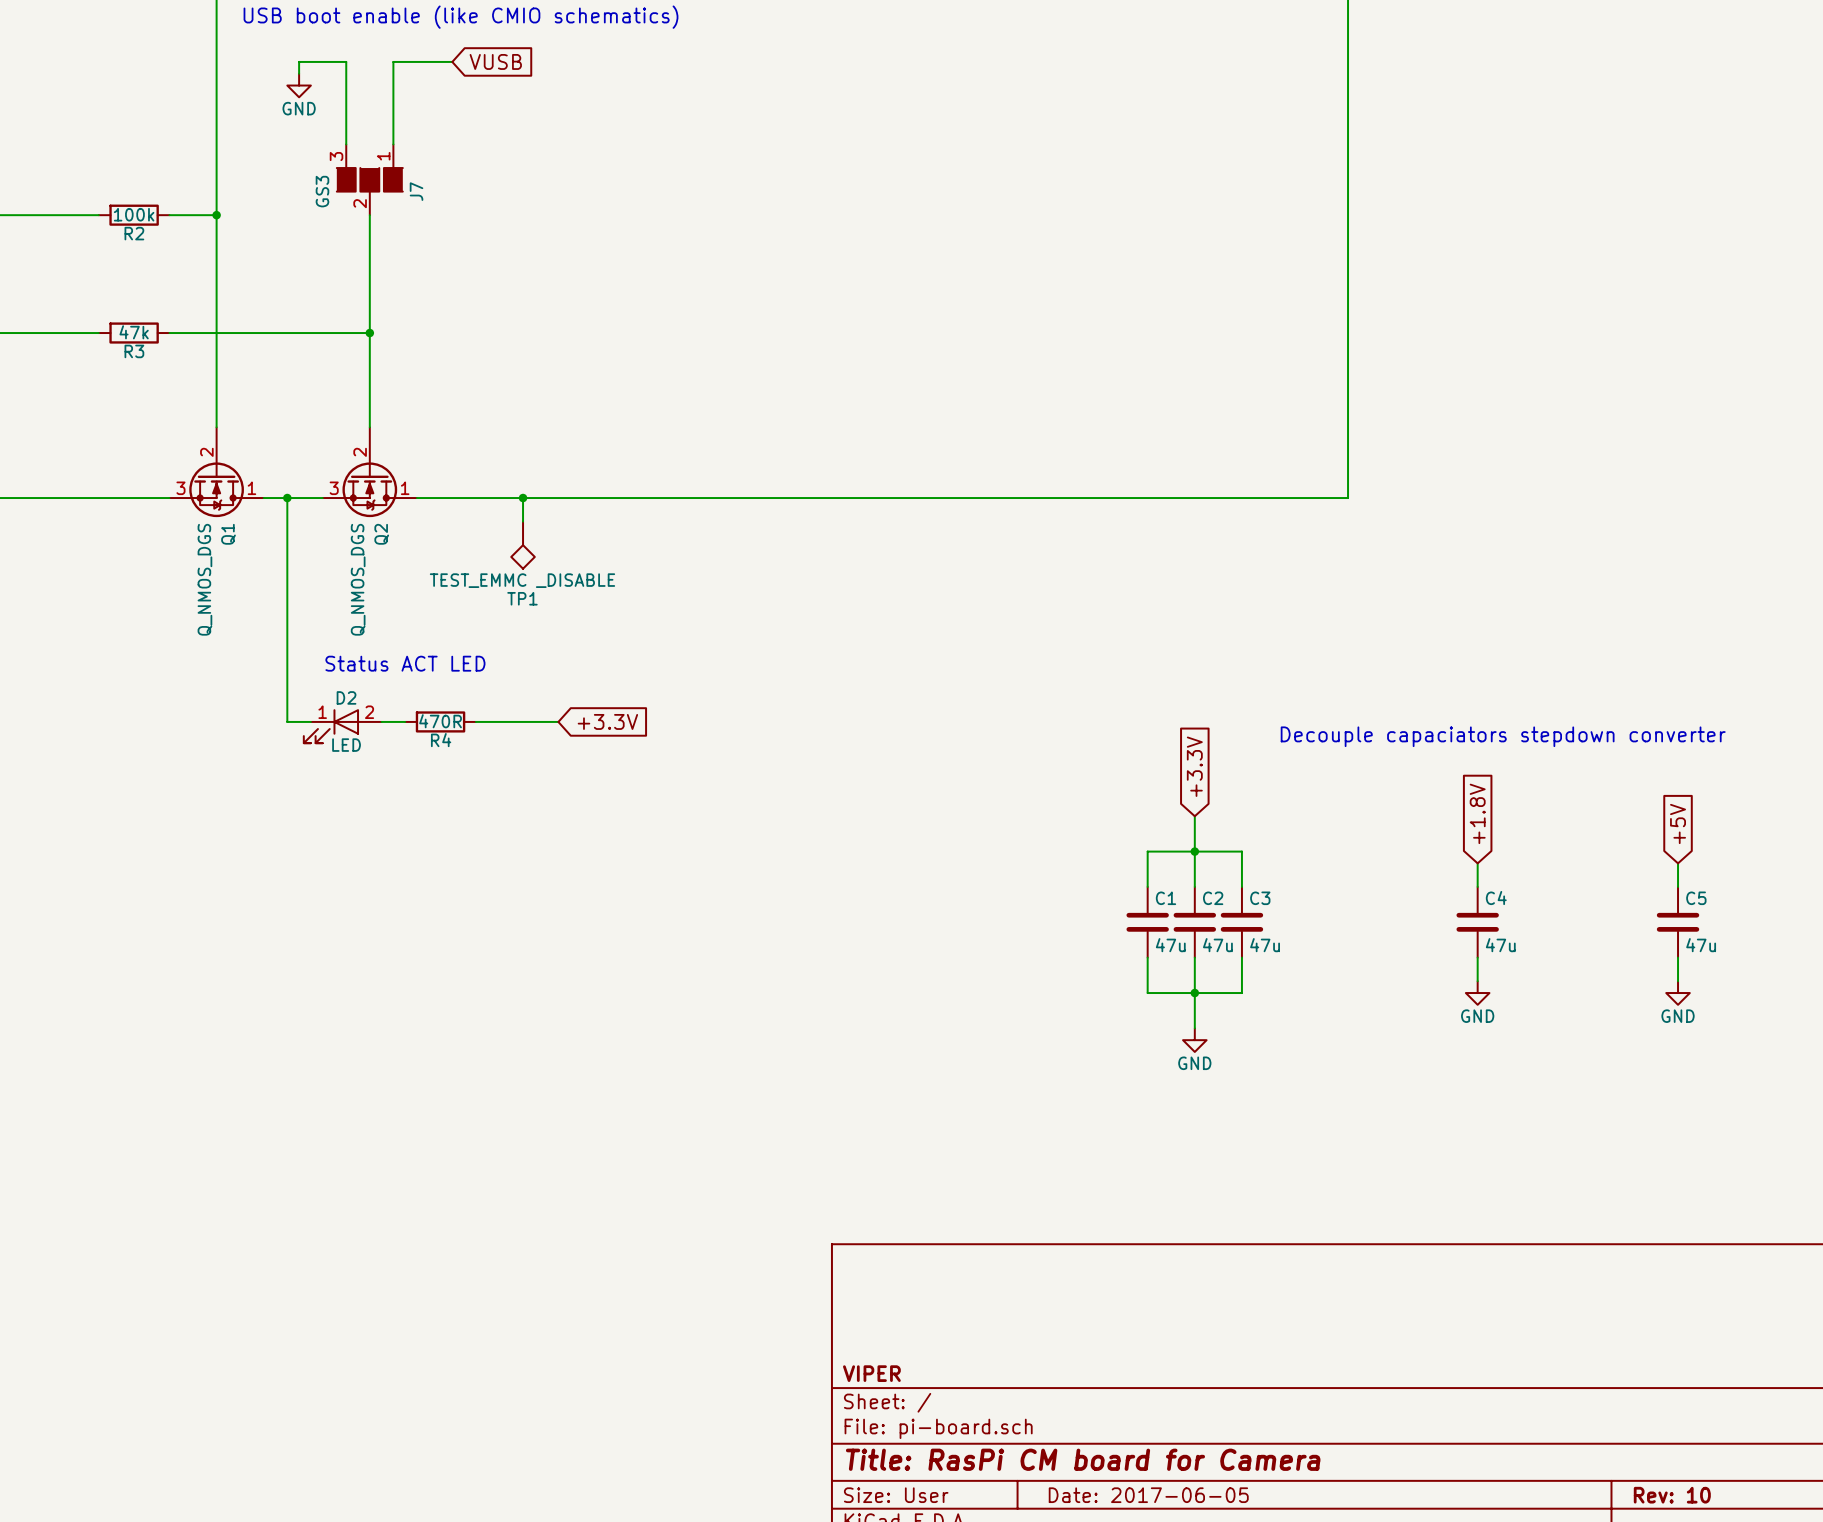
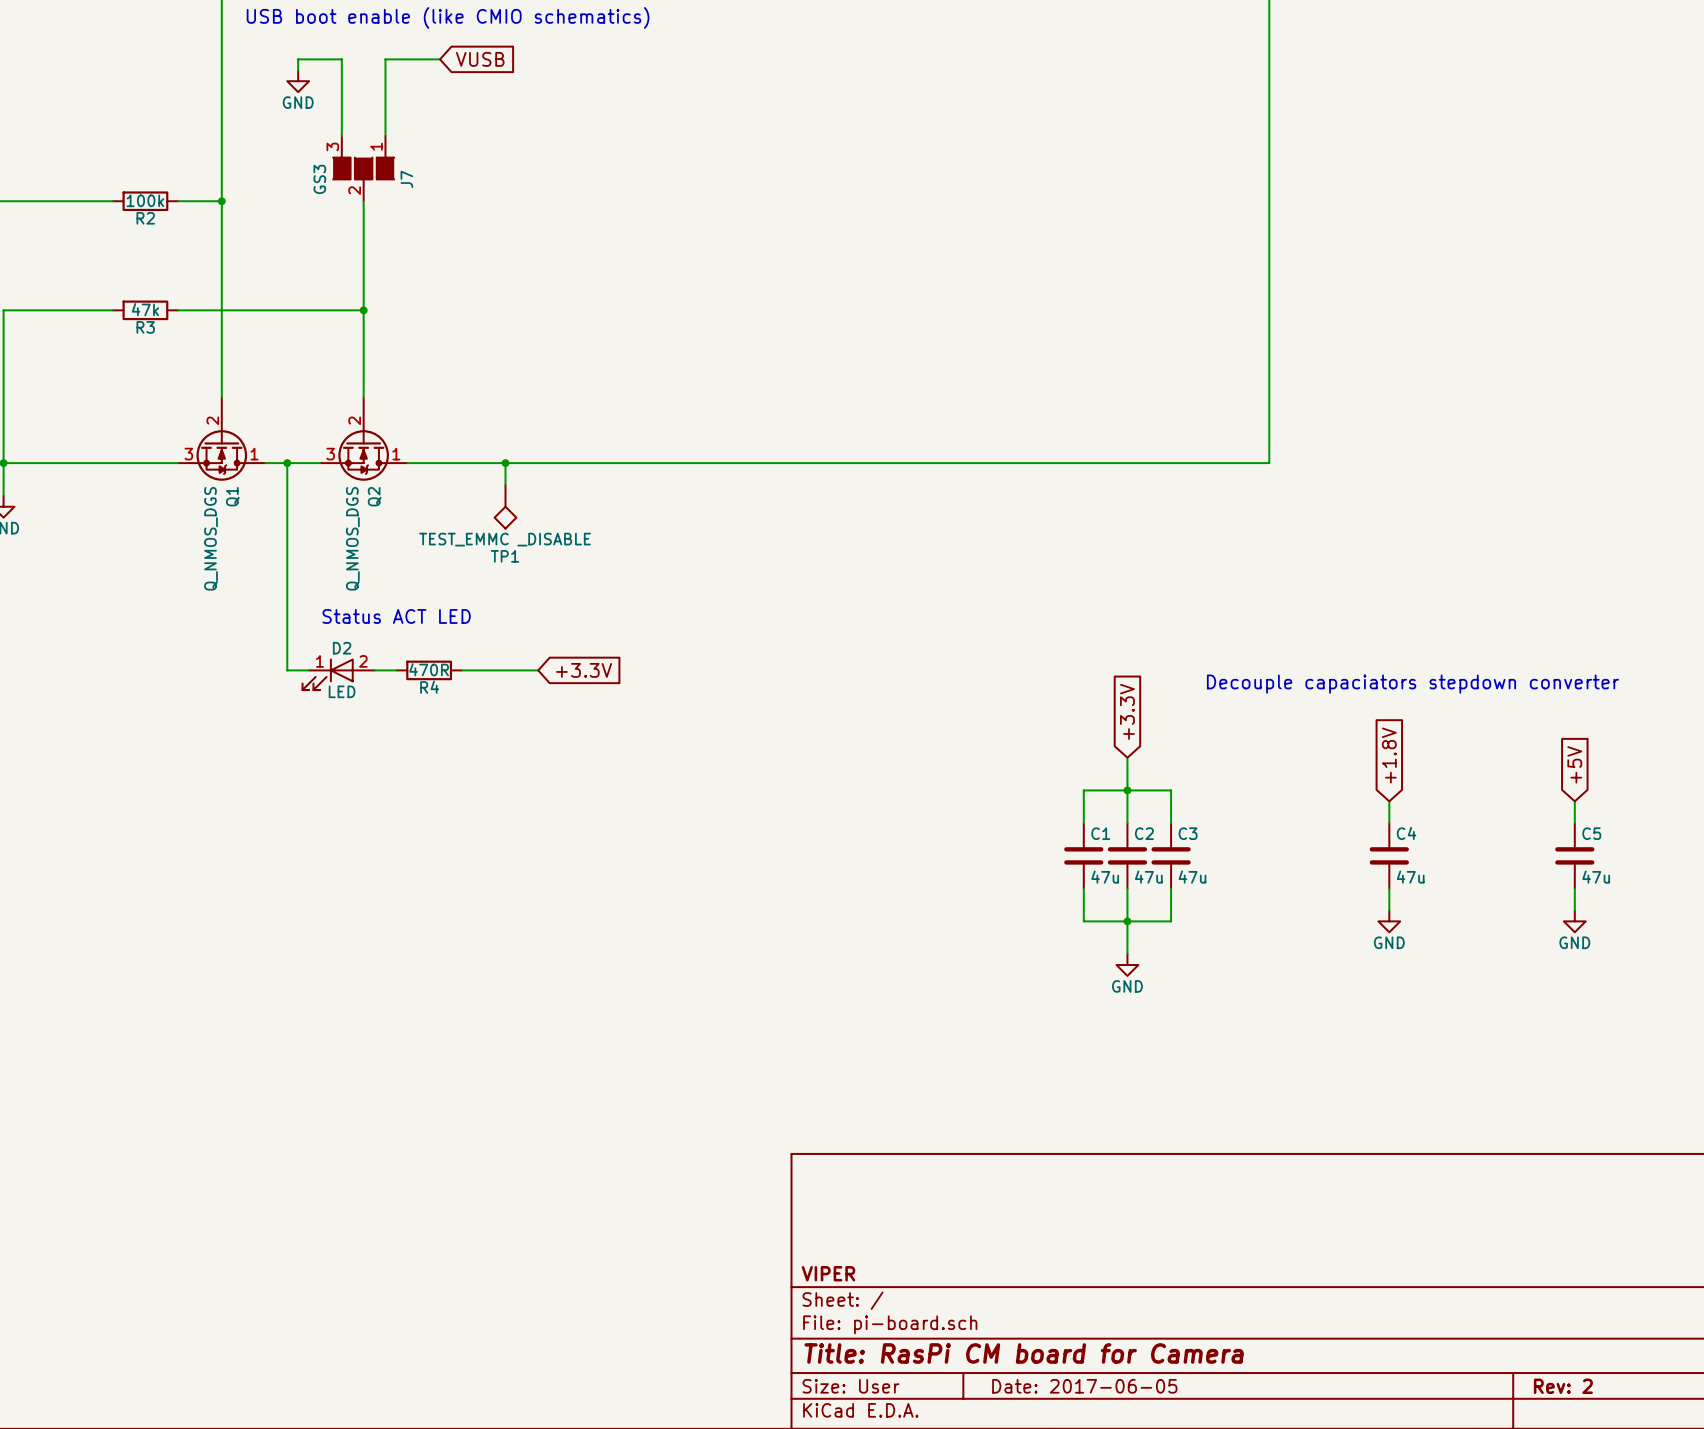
title block: Rev: 10 (1672, 1495) -> Rev: 2 (1563, 1386)

